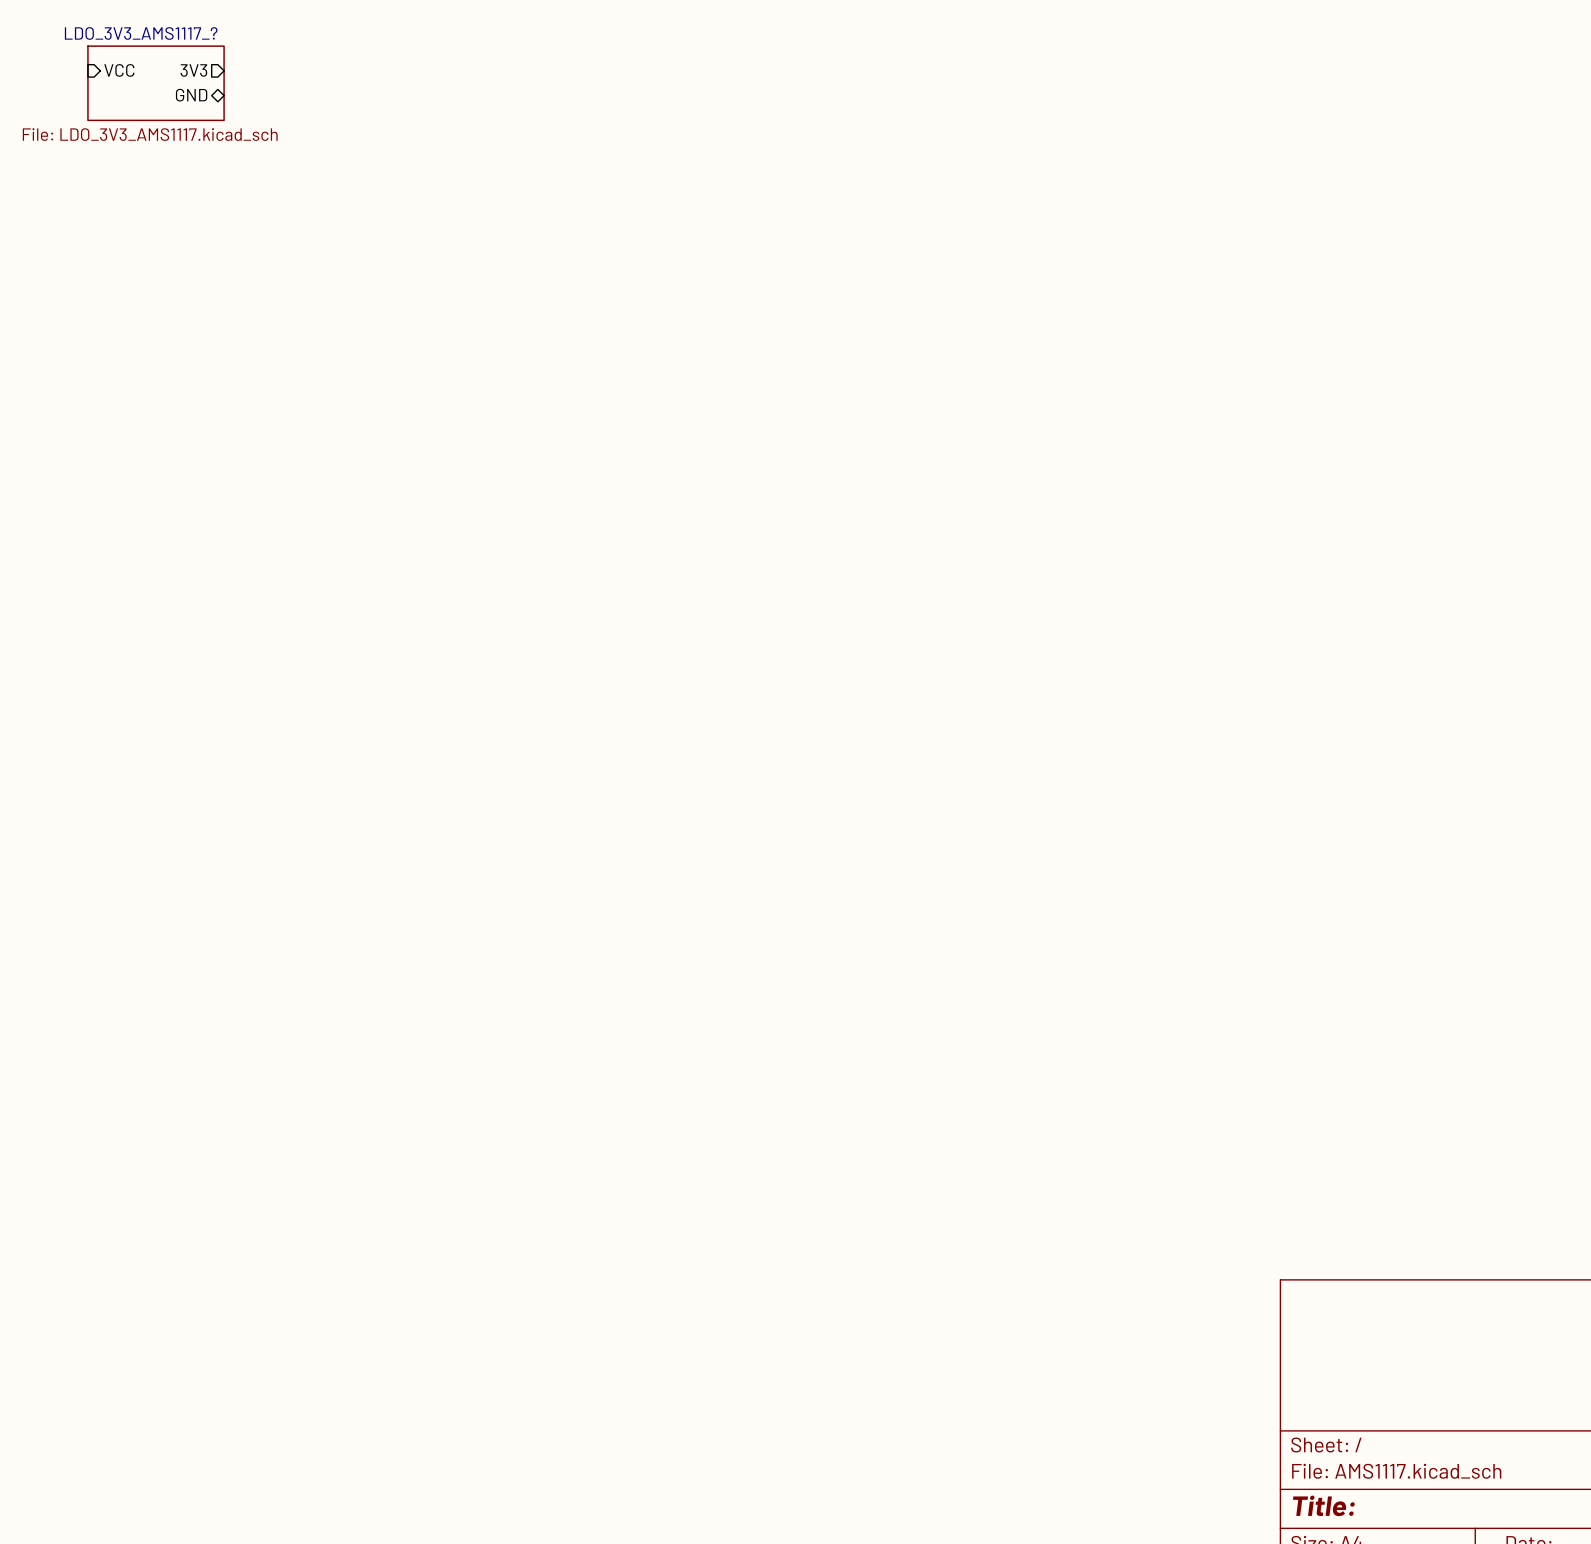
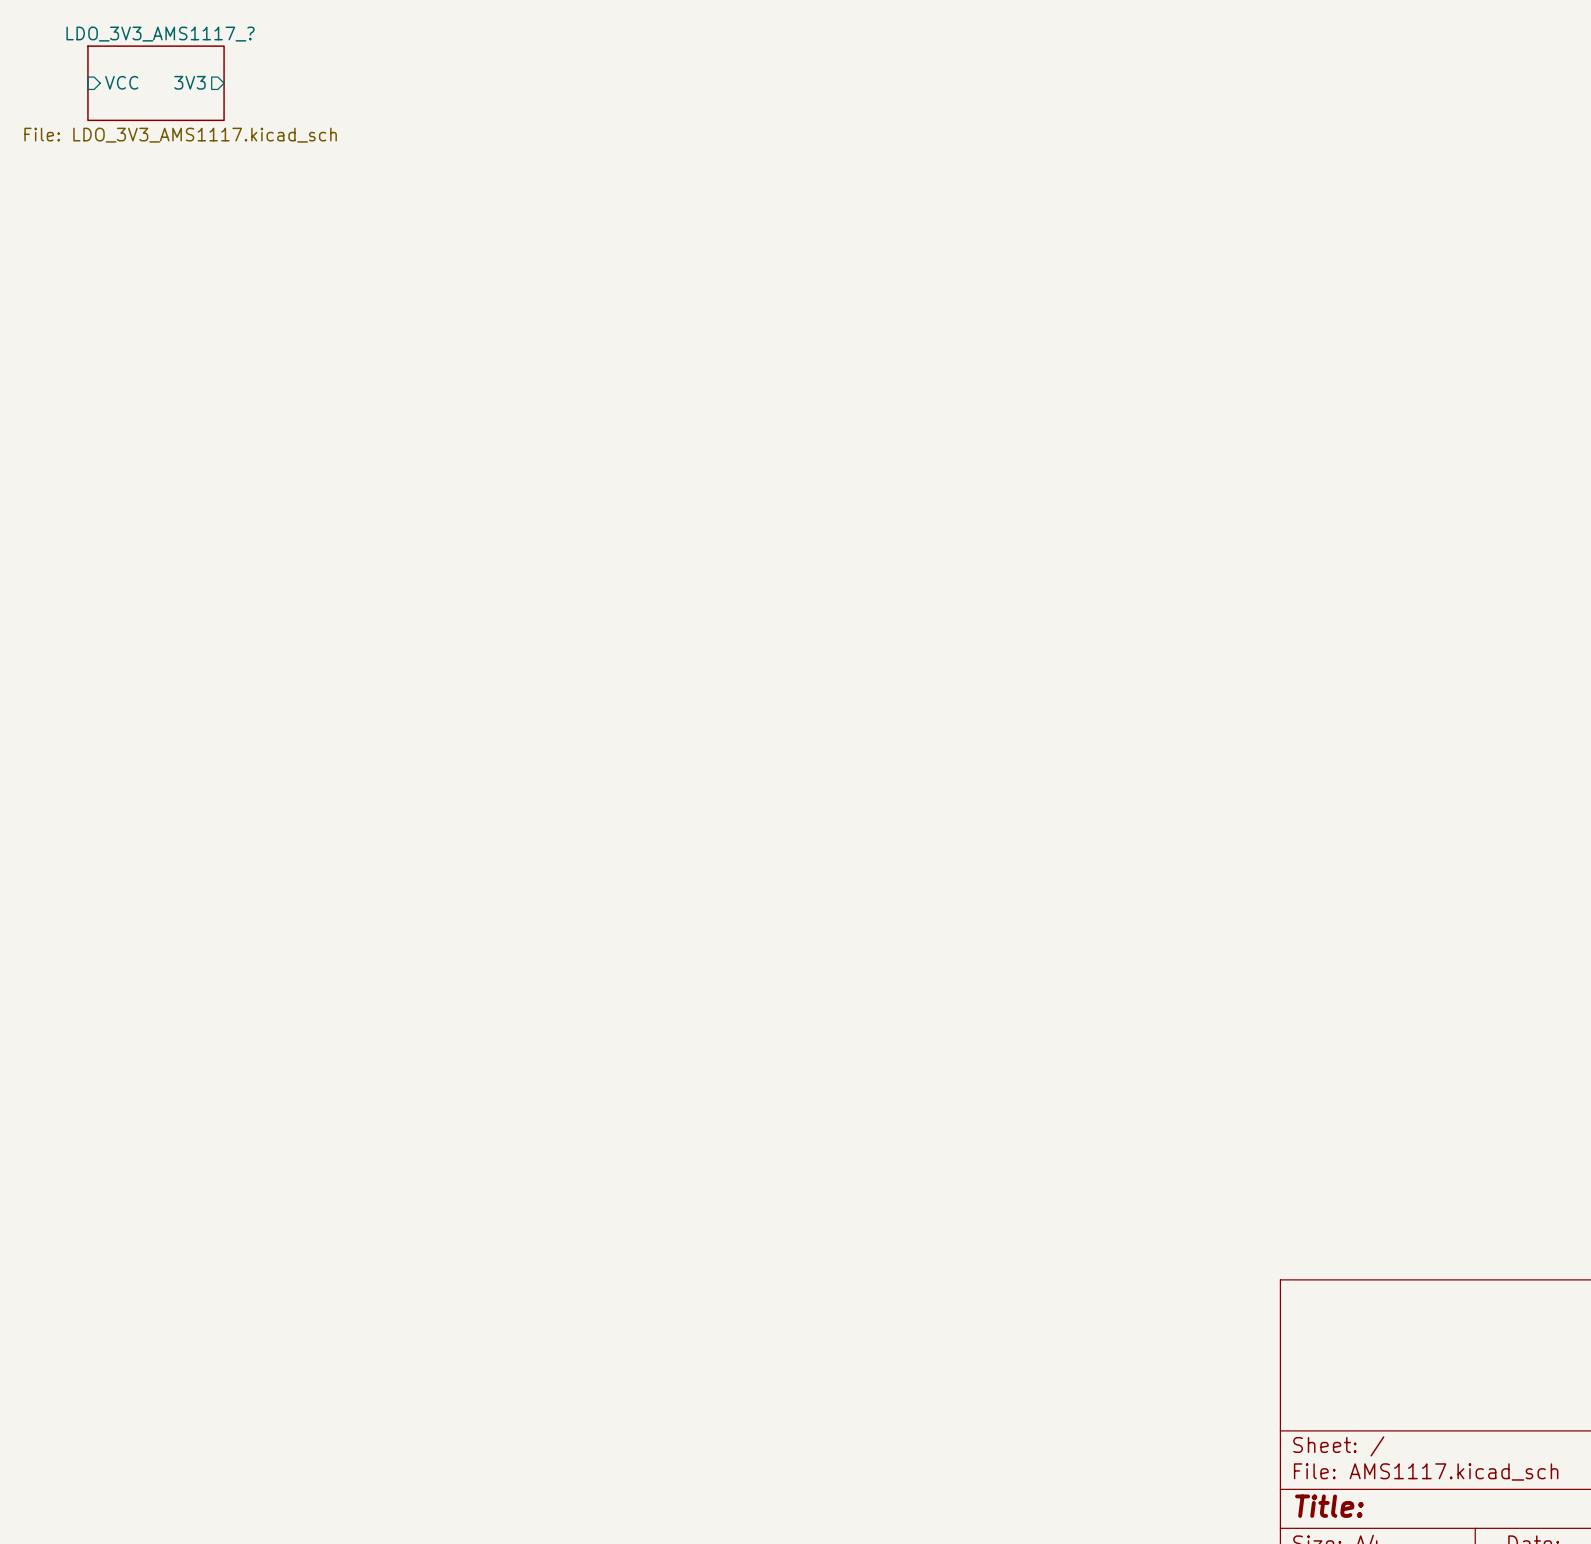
sheet pin position: VCC (119, 70) -> VCC (121, 82)
sheet pin position: 3V3 (193, 70) -> 3V3 (189, 82)
sheet pin: GND (191, 95) -> none

